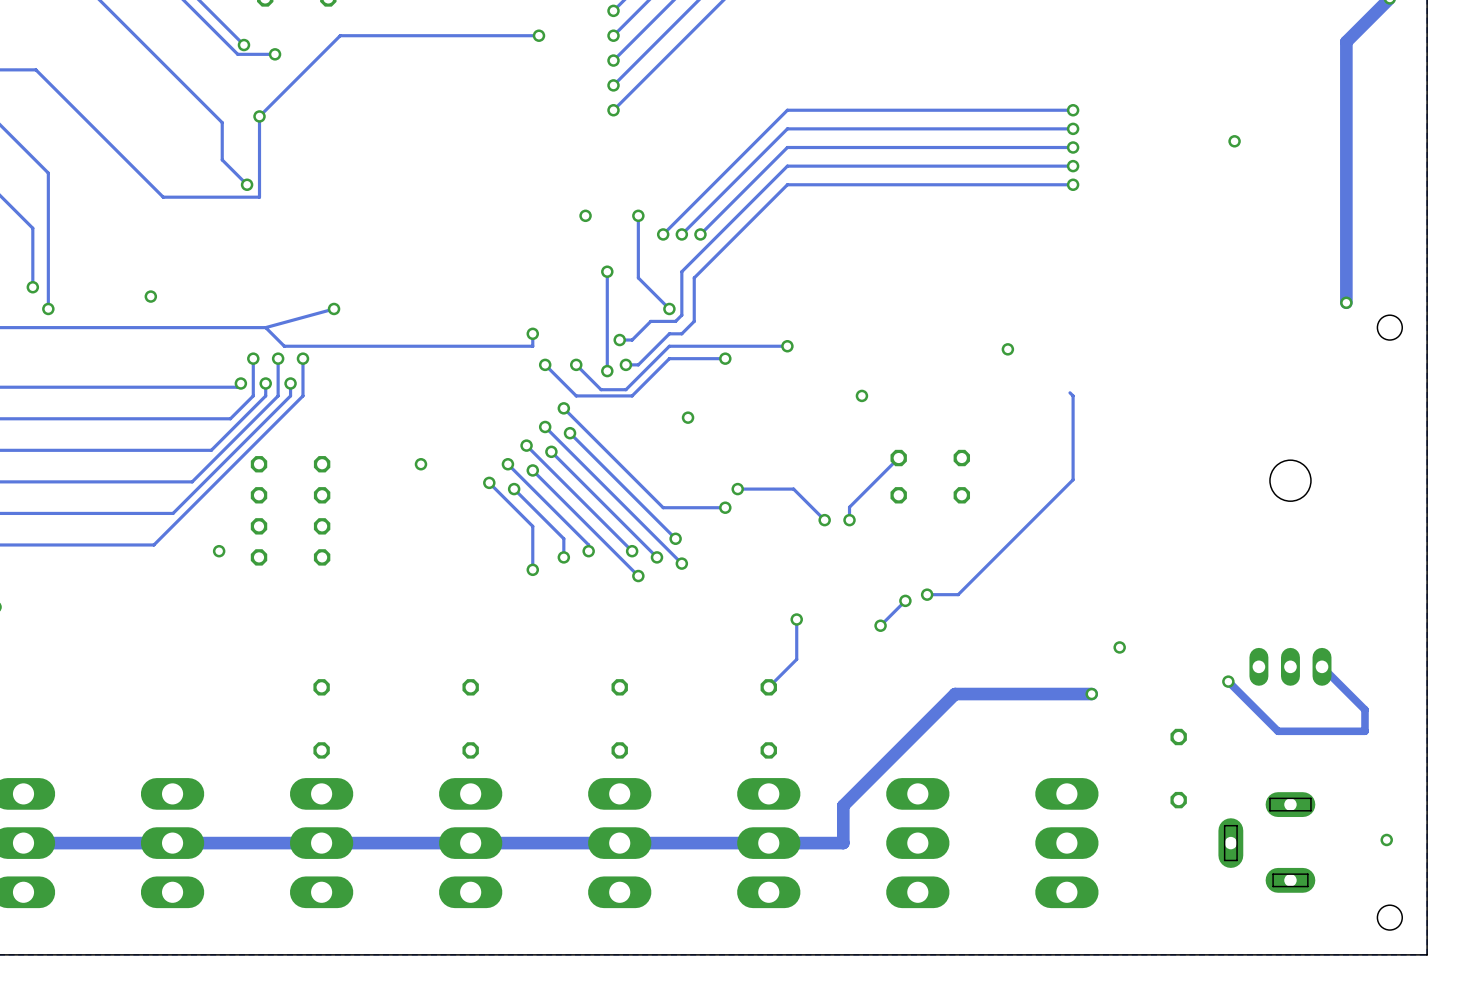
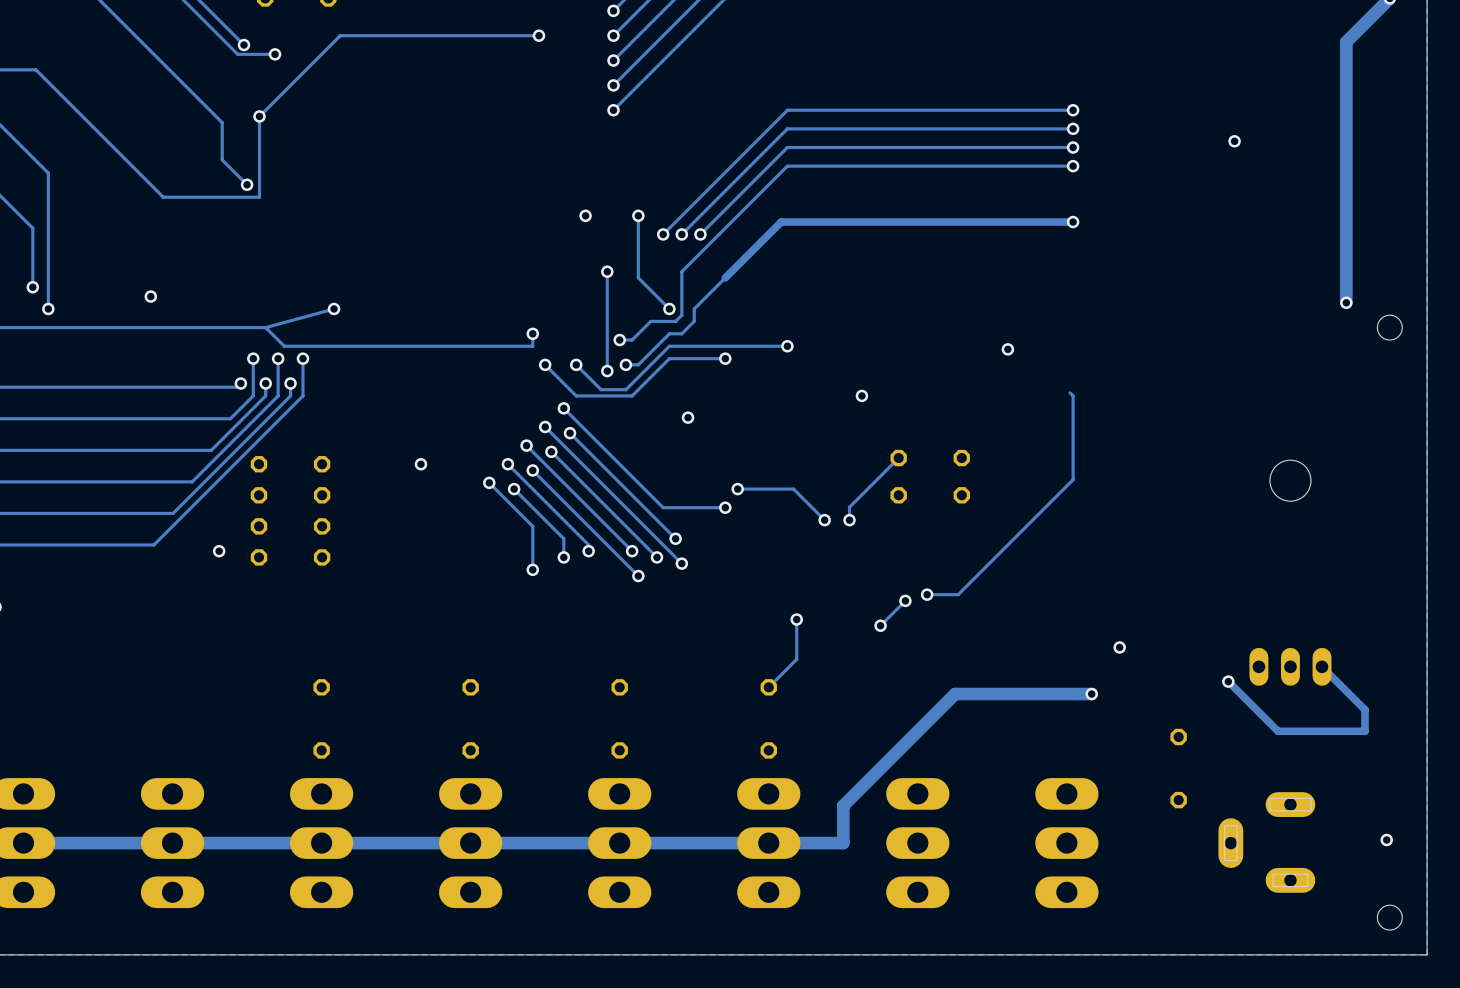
track: (1073, 184) (787, 184) (694, 277) (694, 308) -> (1073, 222) (781, 222) (694, 308)
via position: (1073, 184) -> (1073, 222)

